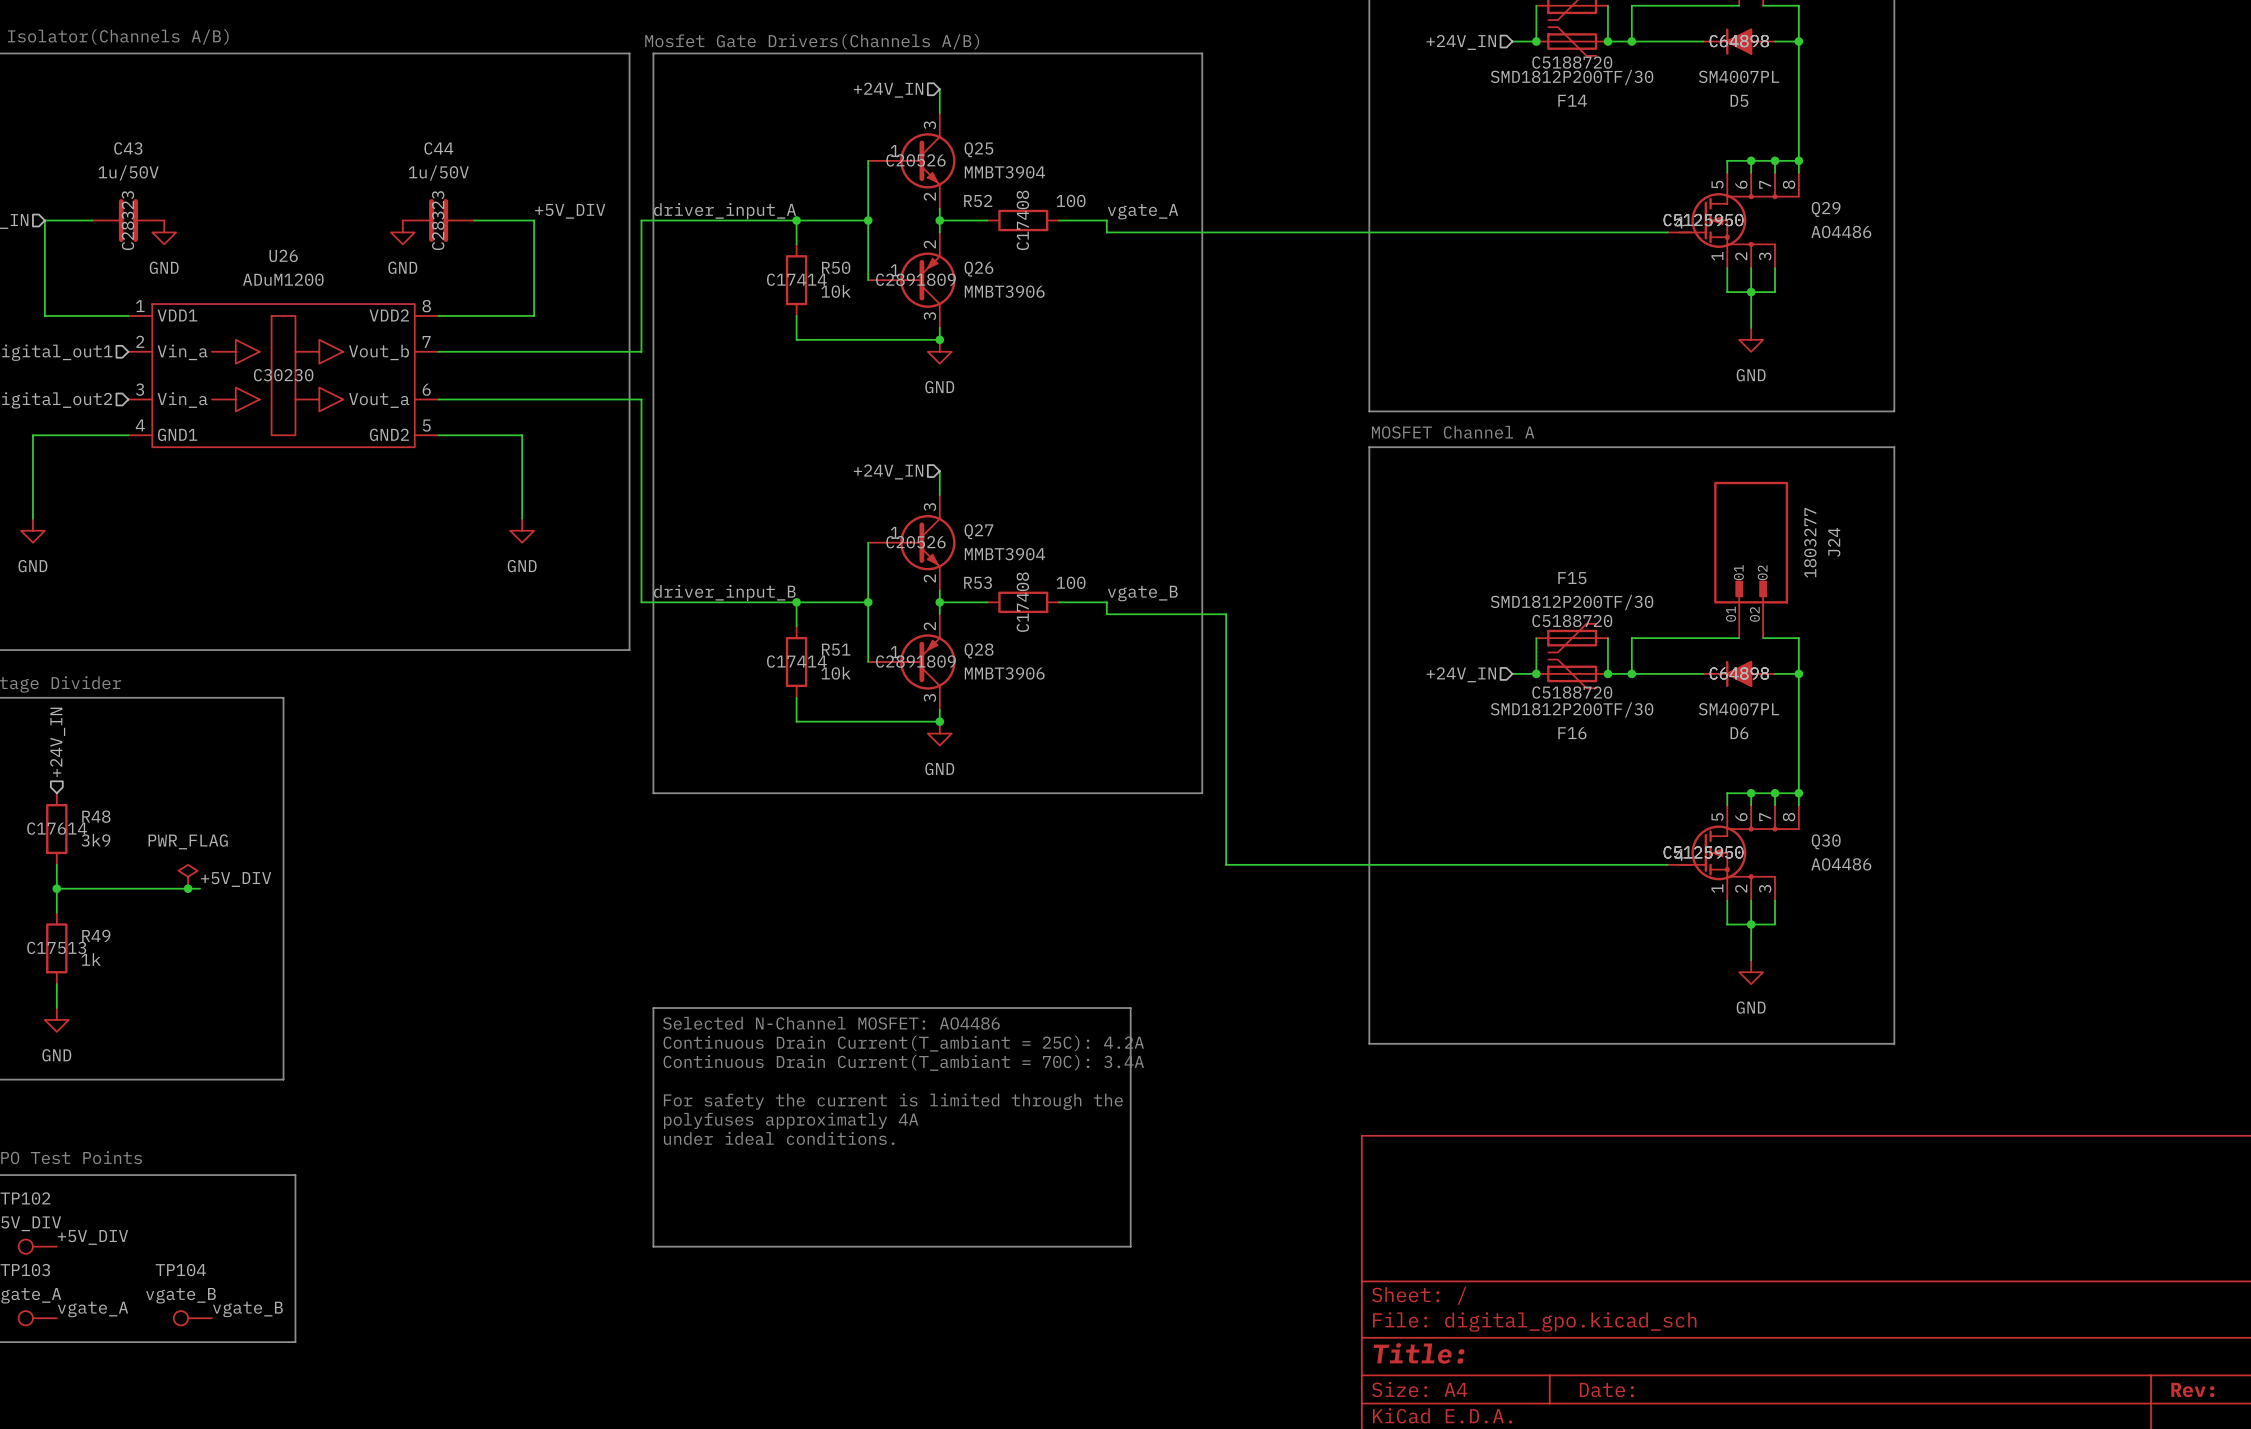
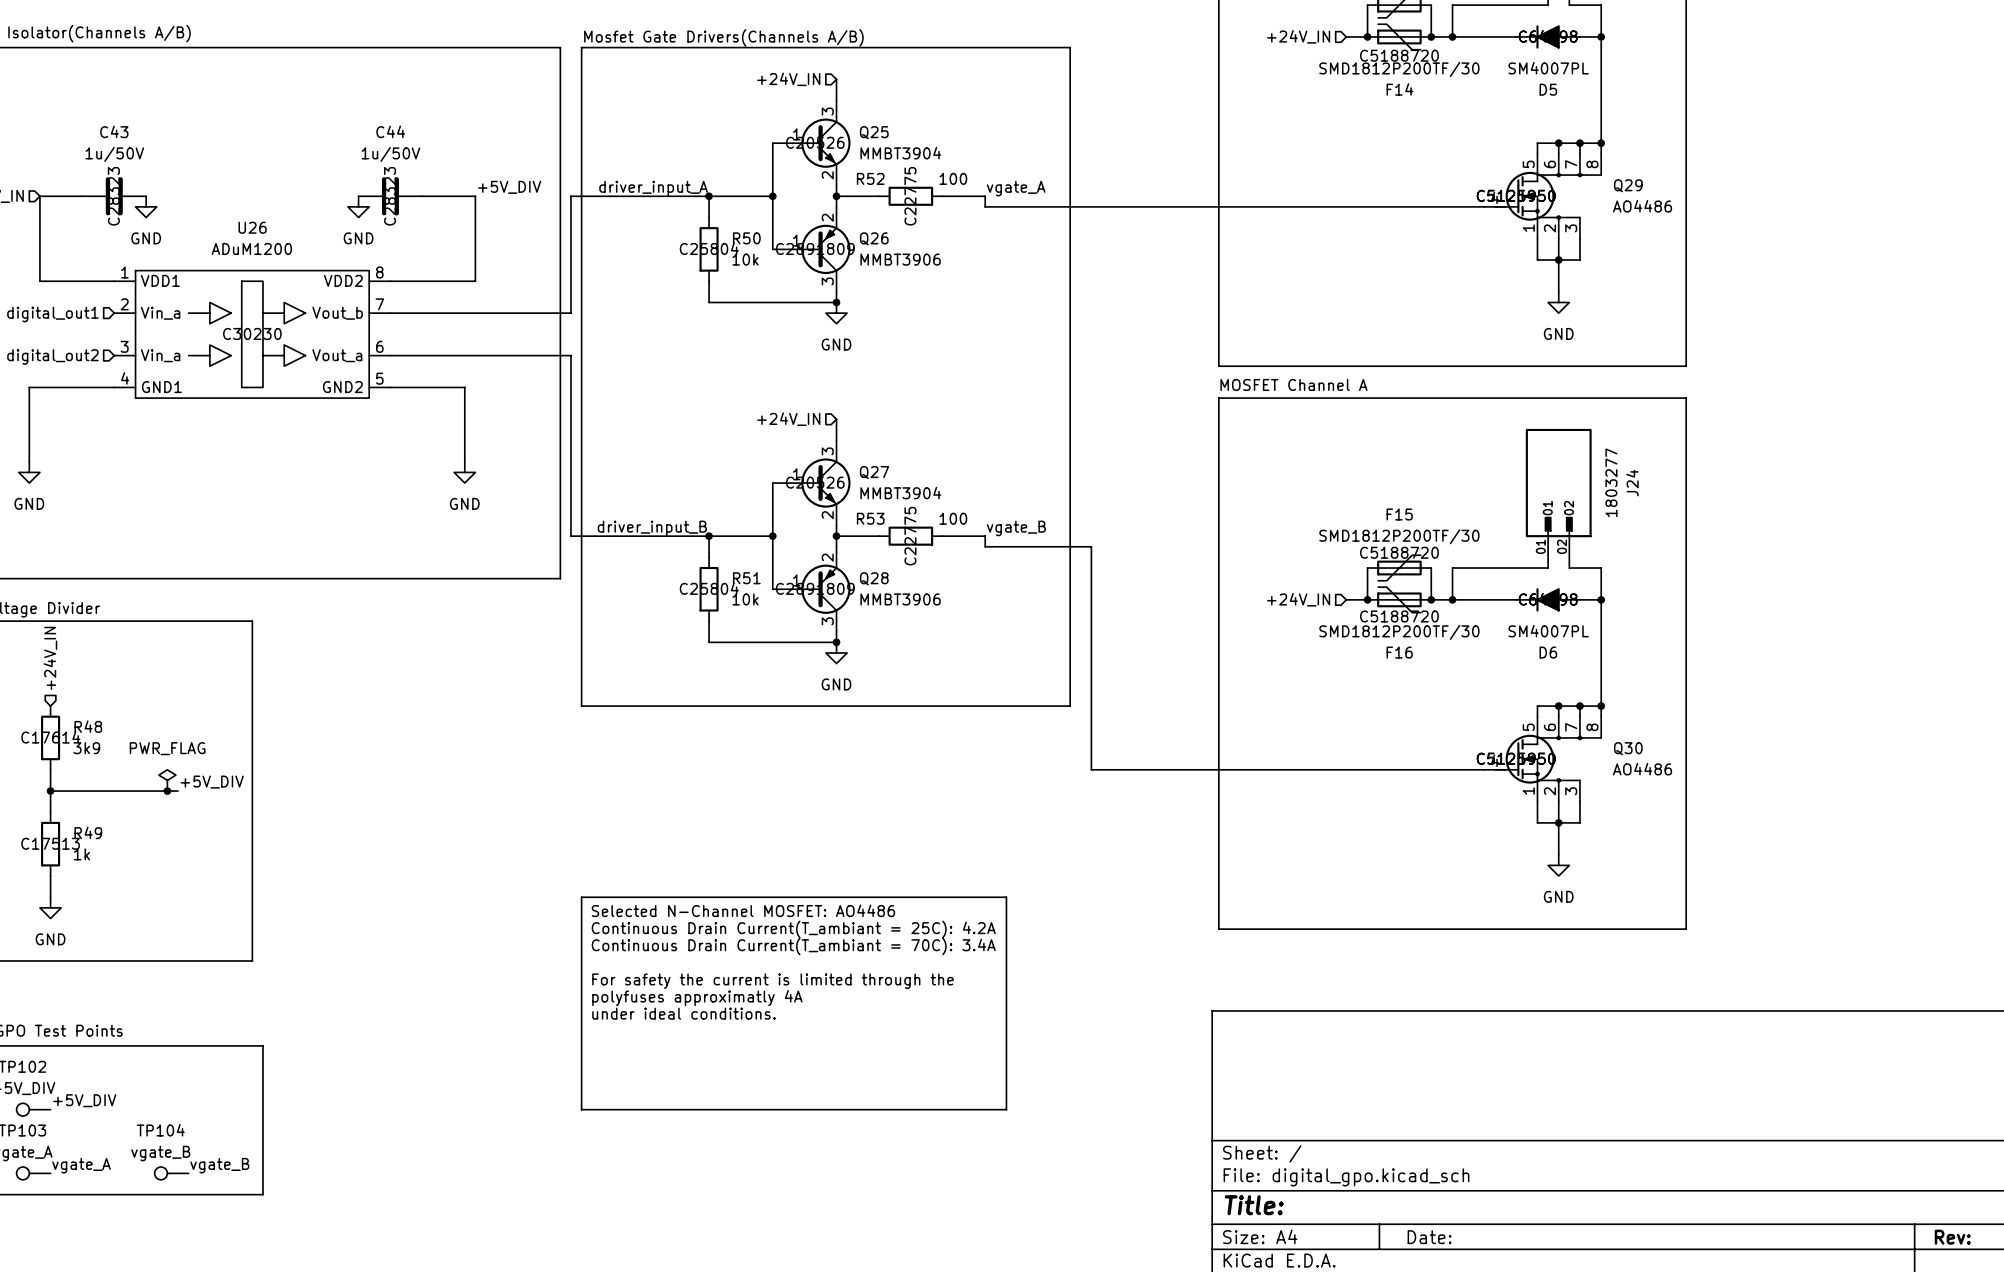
R52 text: C17408 (1022, 220) -> C22775 (910, 196)
R50 text: C17414 (796, 279) -> C25804 (709, 248)
R53 text: C17408 (1022, 602) -> C22775 (910, 536)
R51 text: C17414 (796, 661) -> C25804 (709, 588)

